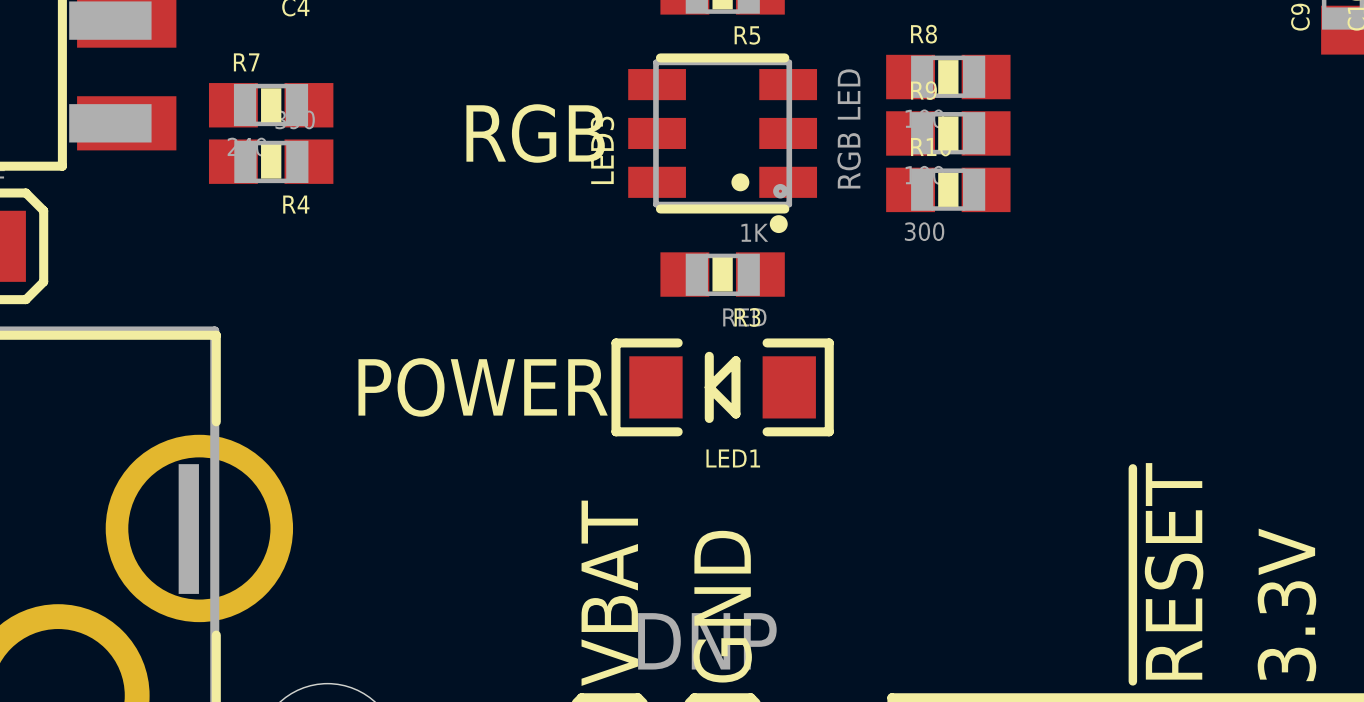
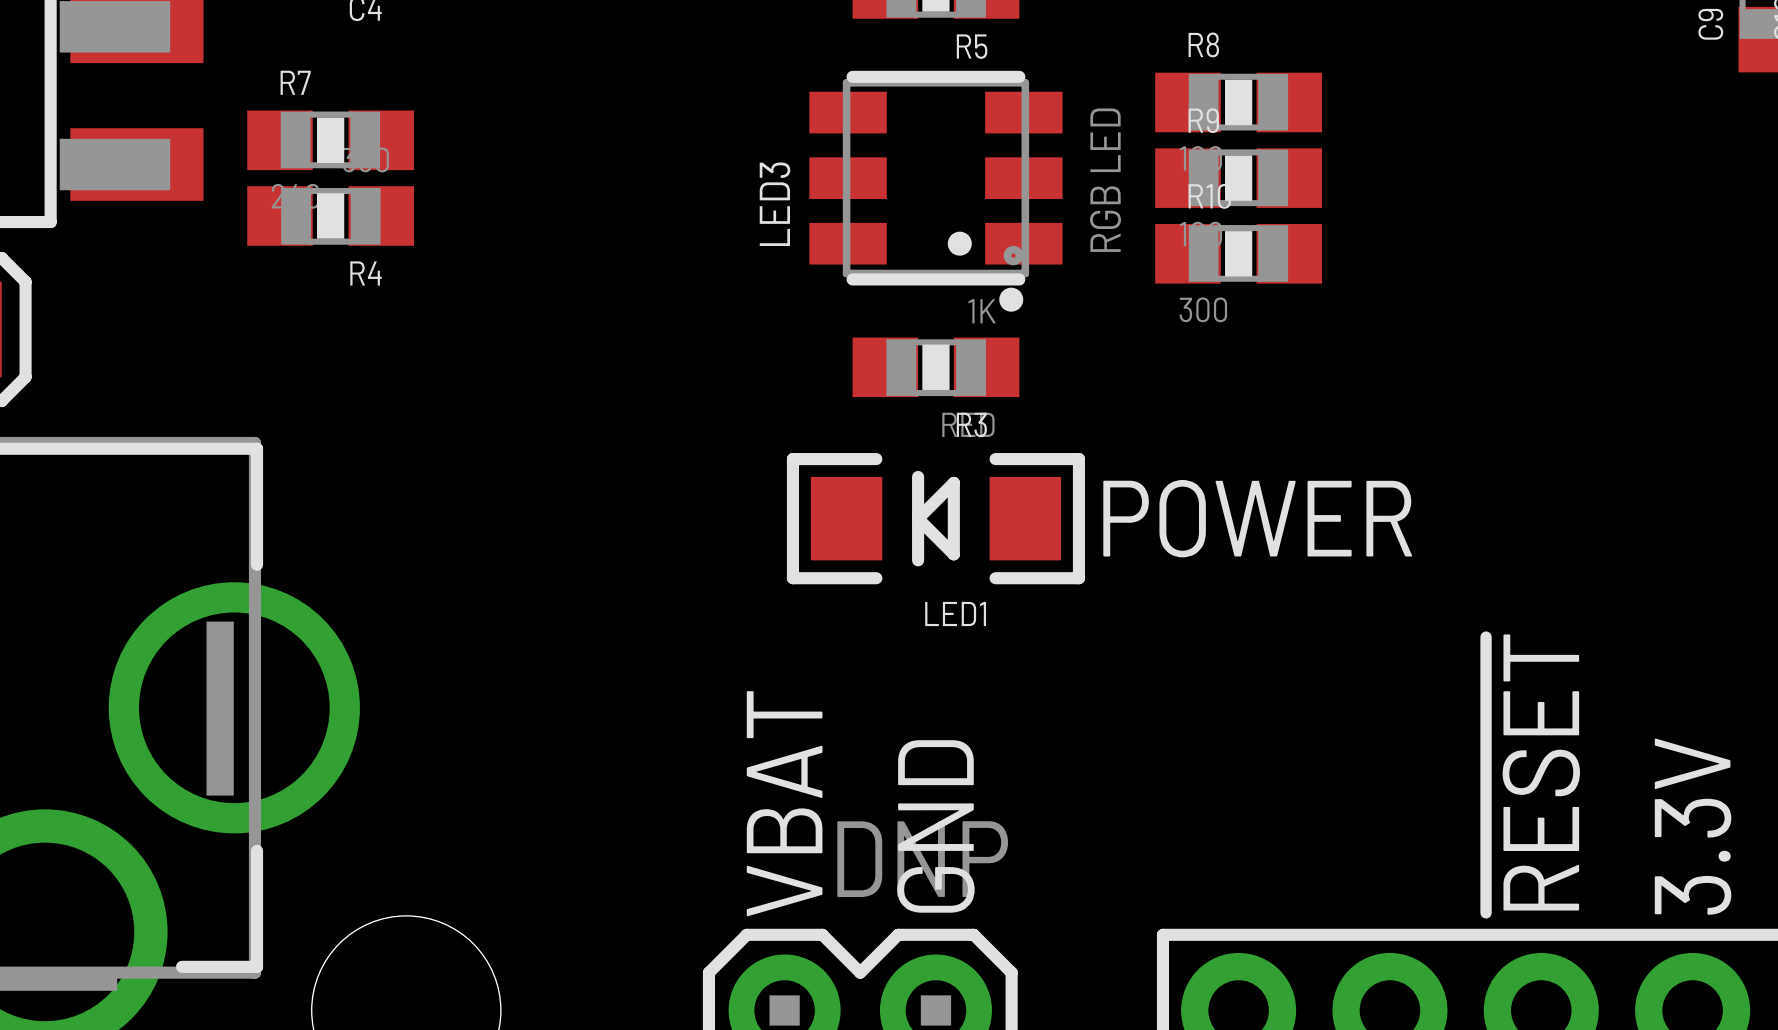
text: RGB (535, 133) -> none
text position: POWER (483, 387) -> POWER (1257, 518)

